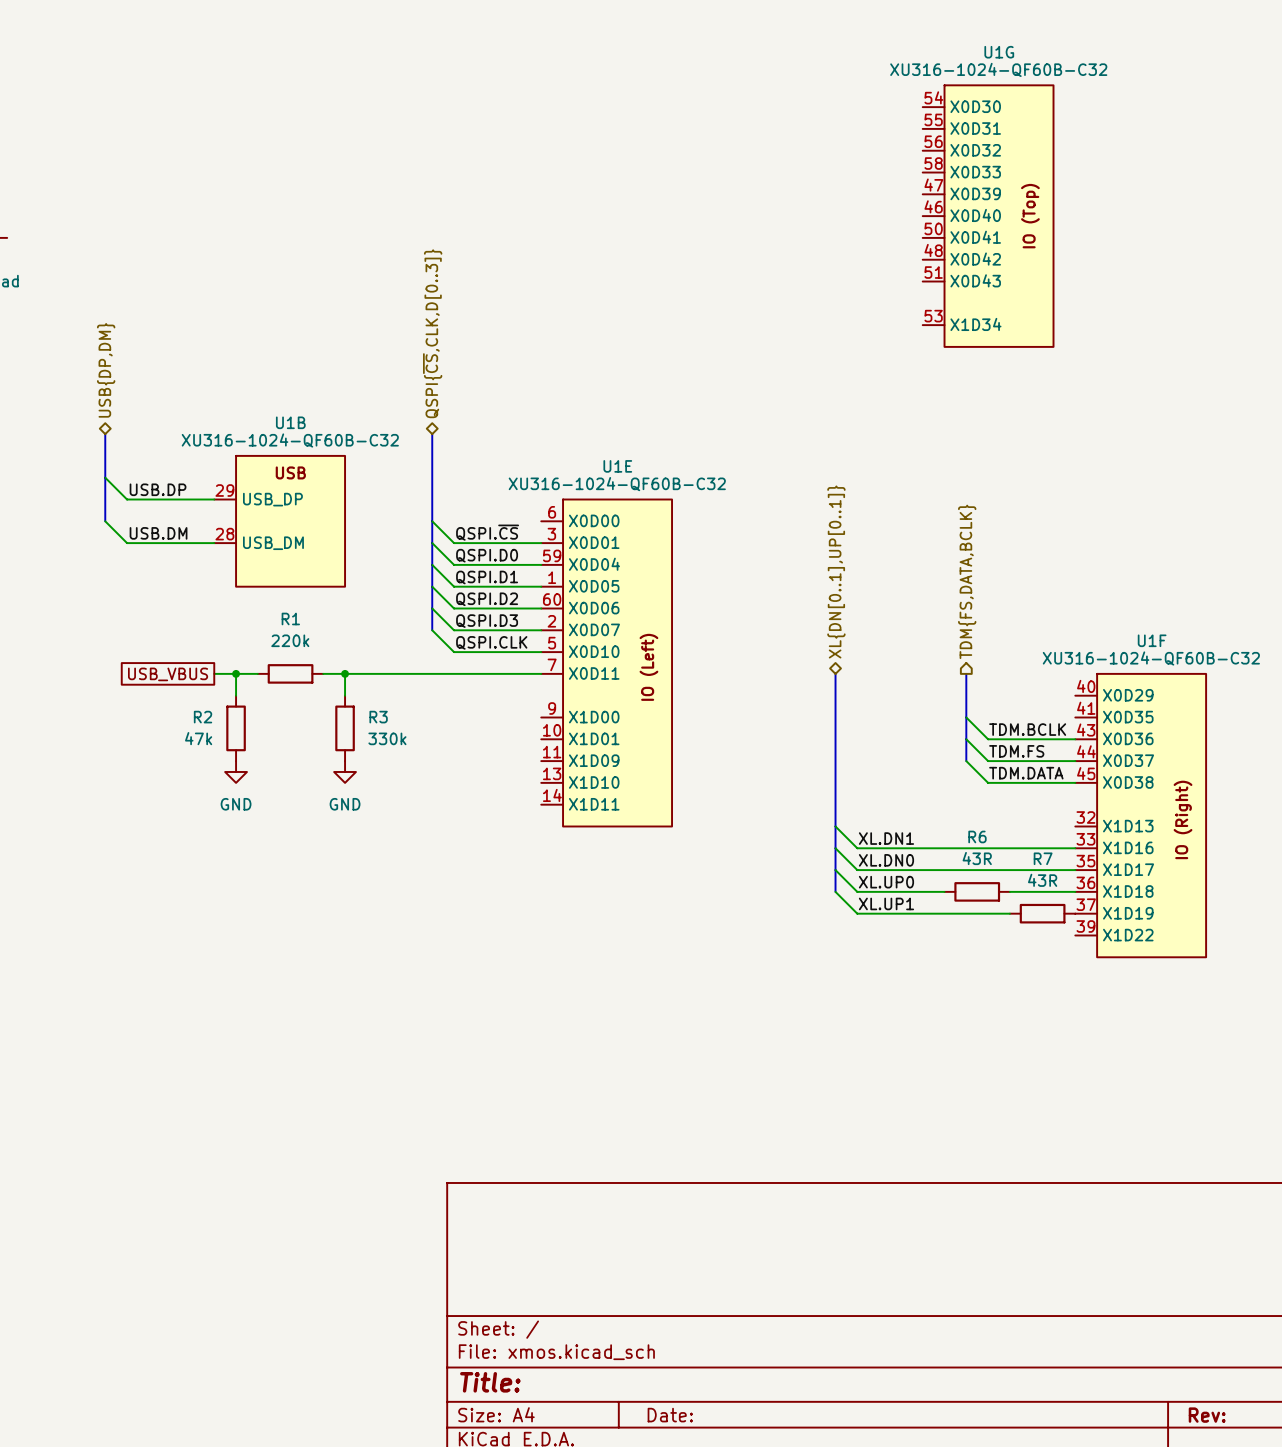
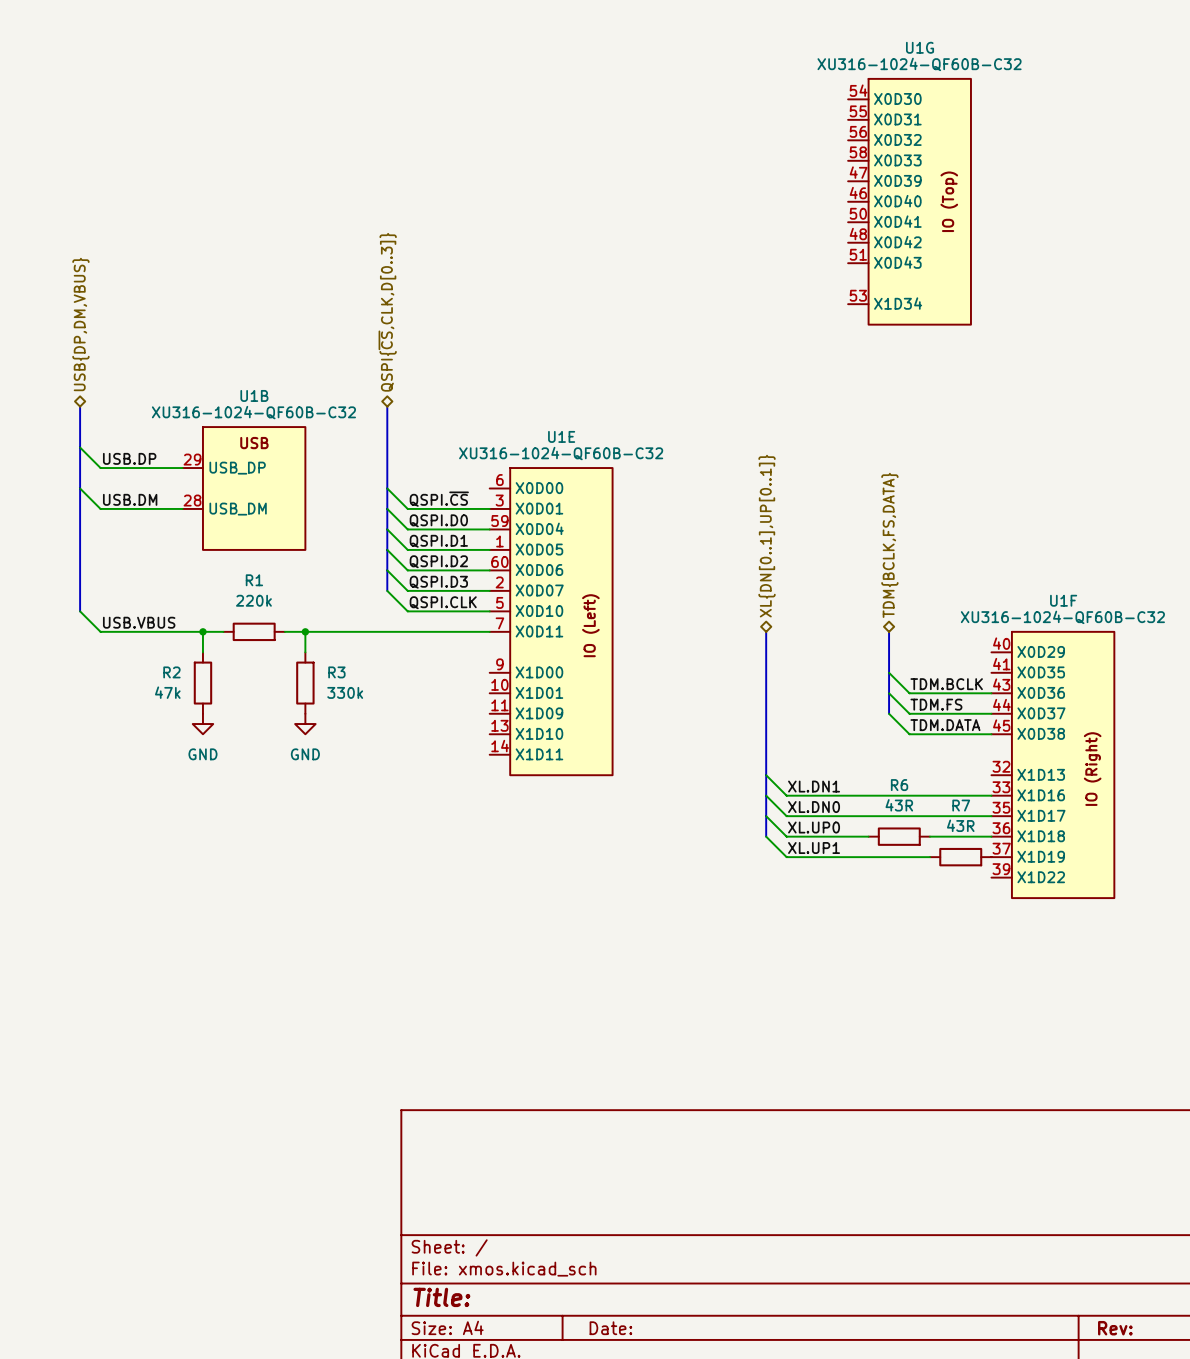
hierarchical label: USB{DP,DM} (106, 370) -> USB{DP,DM,VBUS} (80, 324)
bus: none -> (80, 488) (80, 611)
hierarchical label shape: output (967, 581) -> bidirectional (889, 545)
hierarchical label: TDM{FS,DATA,BCLK} (967, 581) -> TDM{BCLK,FS,DATA} (889, 545)
wire: none -> (80, 611) (100, 631) (182, 631)
label: none -> USB.VBUS (139, 622)
global label: USB_VBUS (168, 674) -> none

